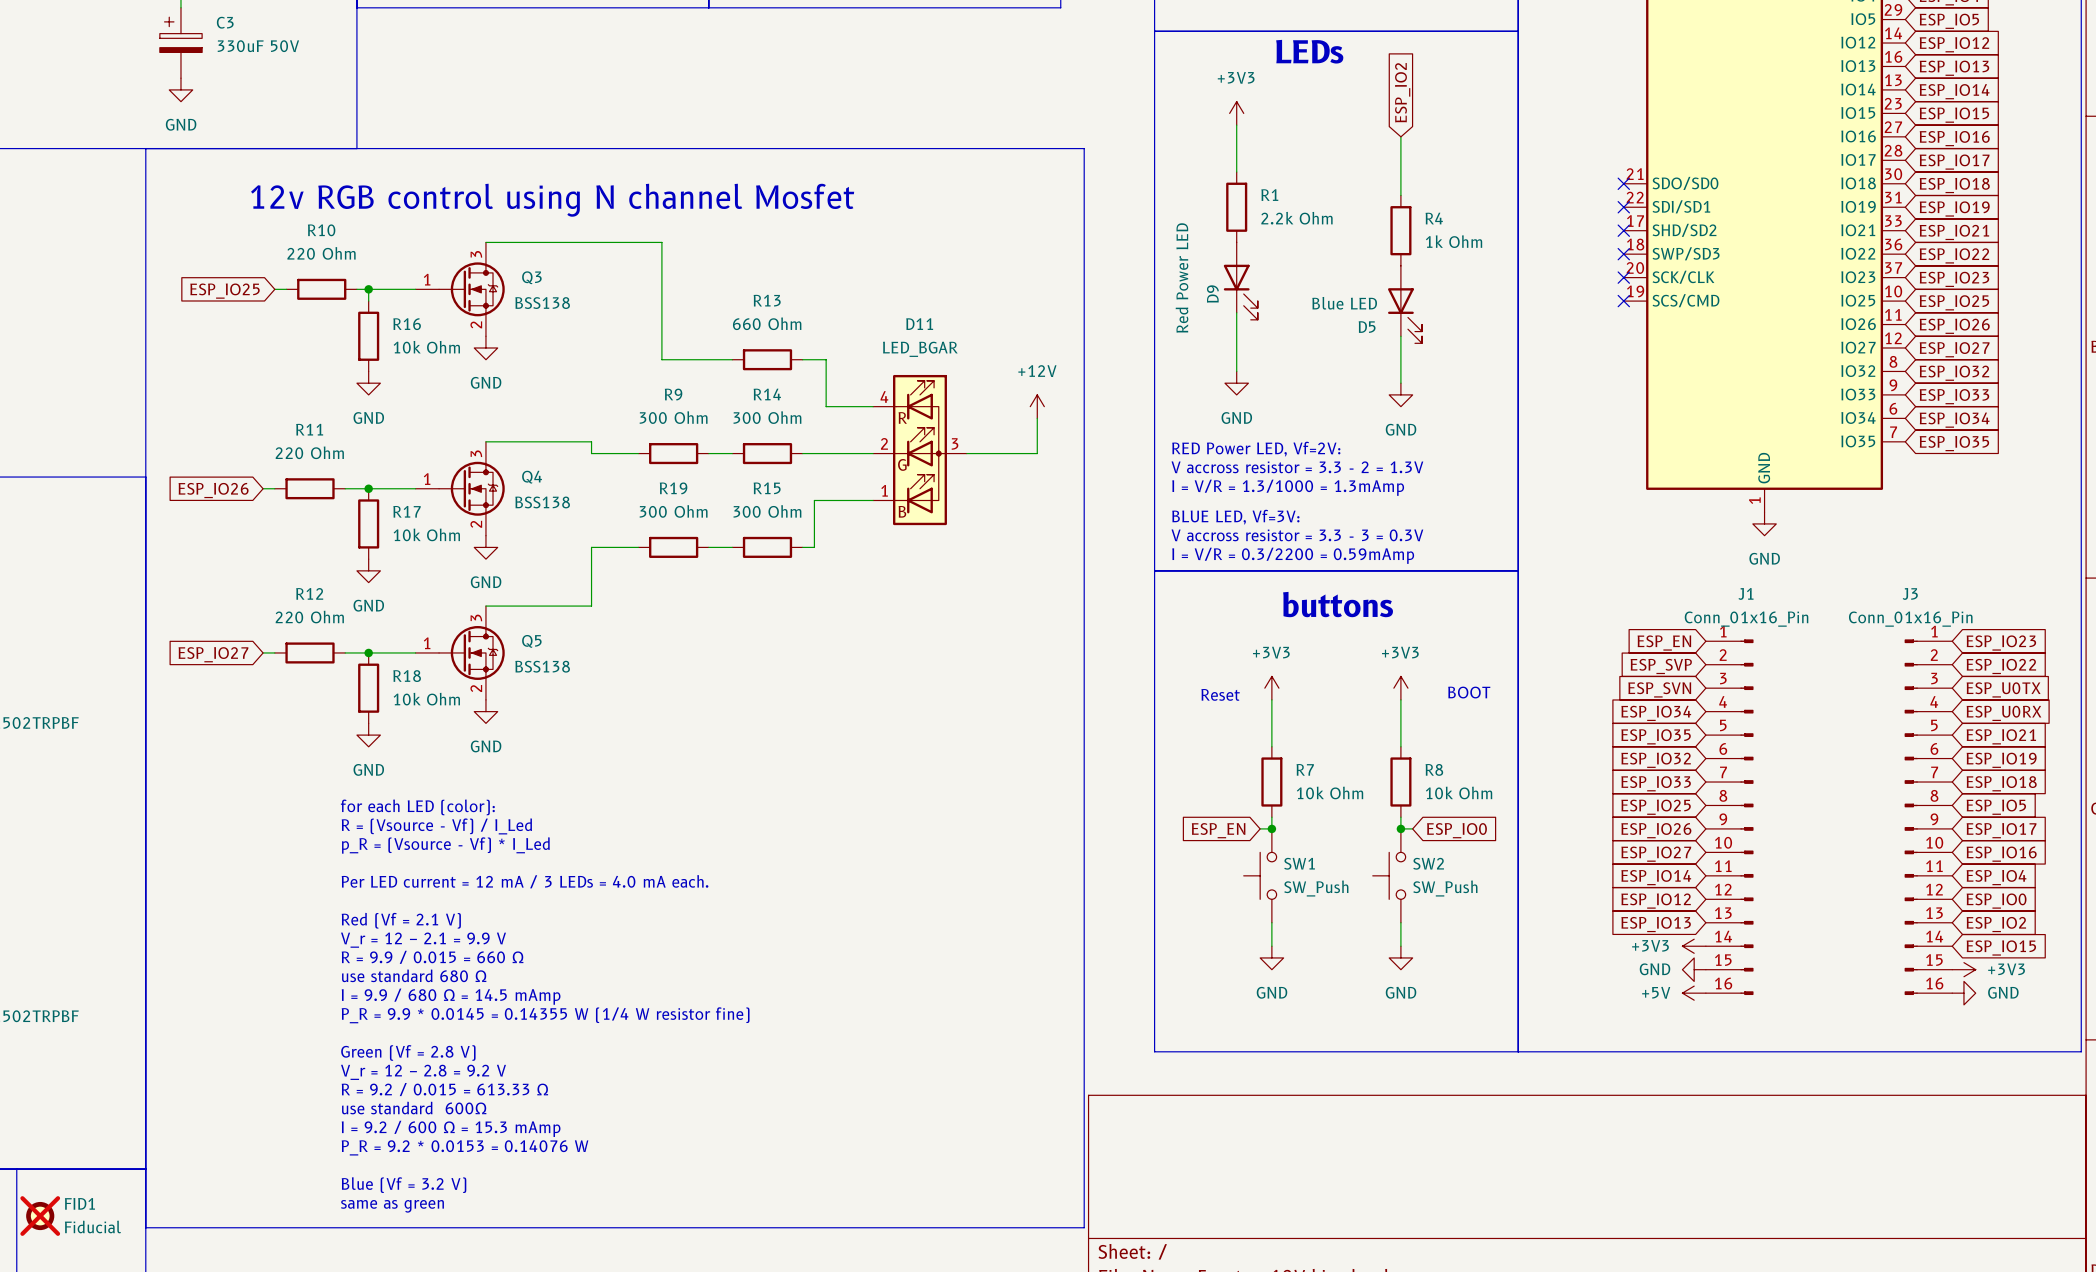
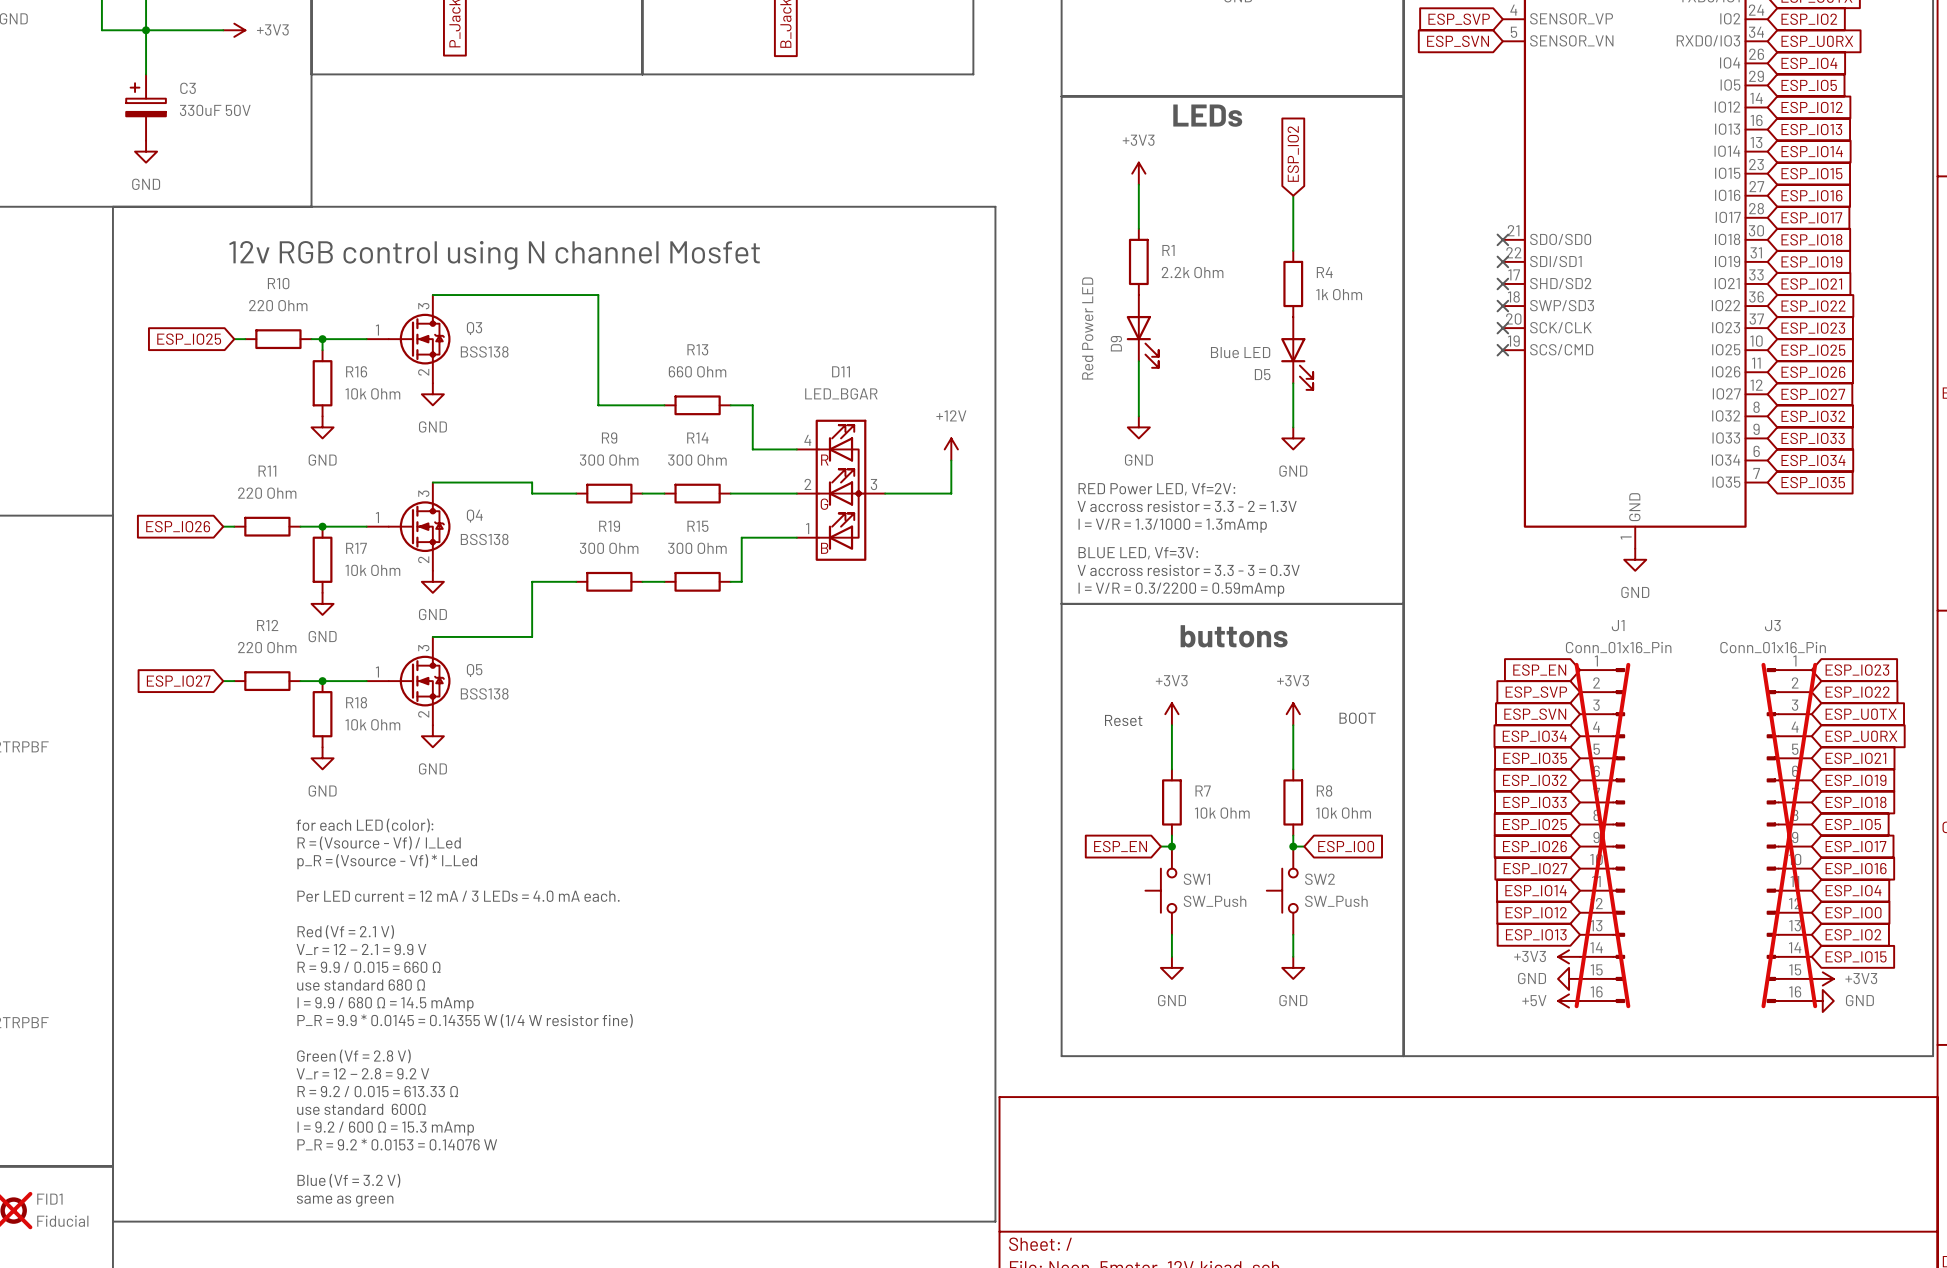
J1 do-not-place cross: none -> (1602, 835)
J3 do-not-place cross: none -> (1789, 835)

